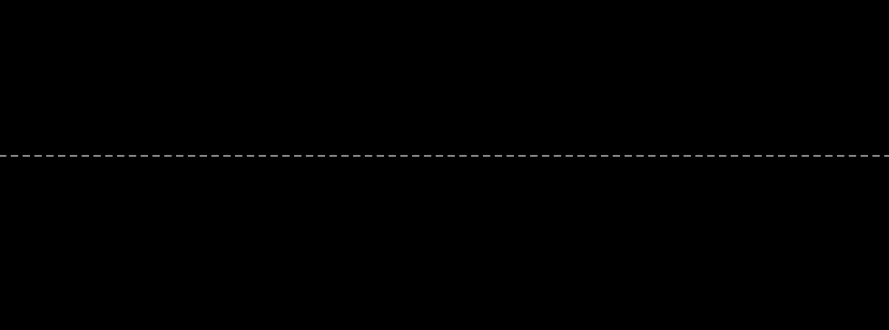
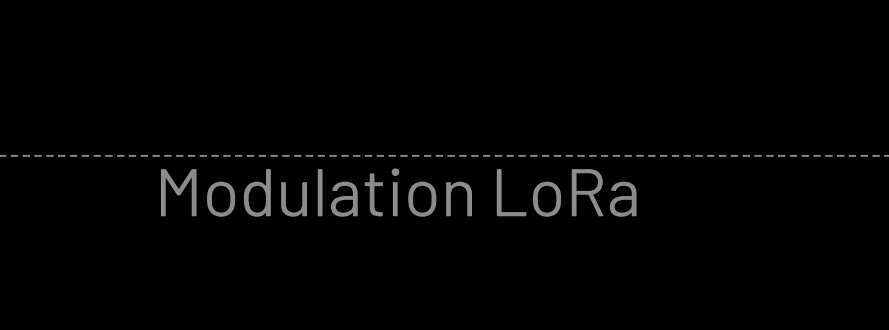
text: none -> Modulation LoRa (398, 192)

